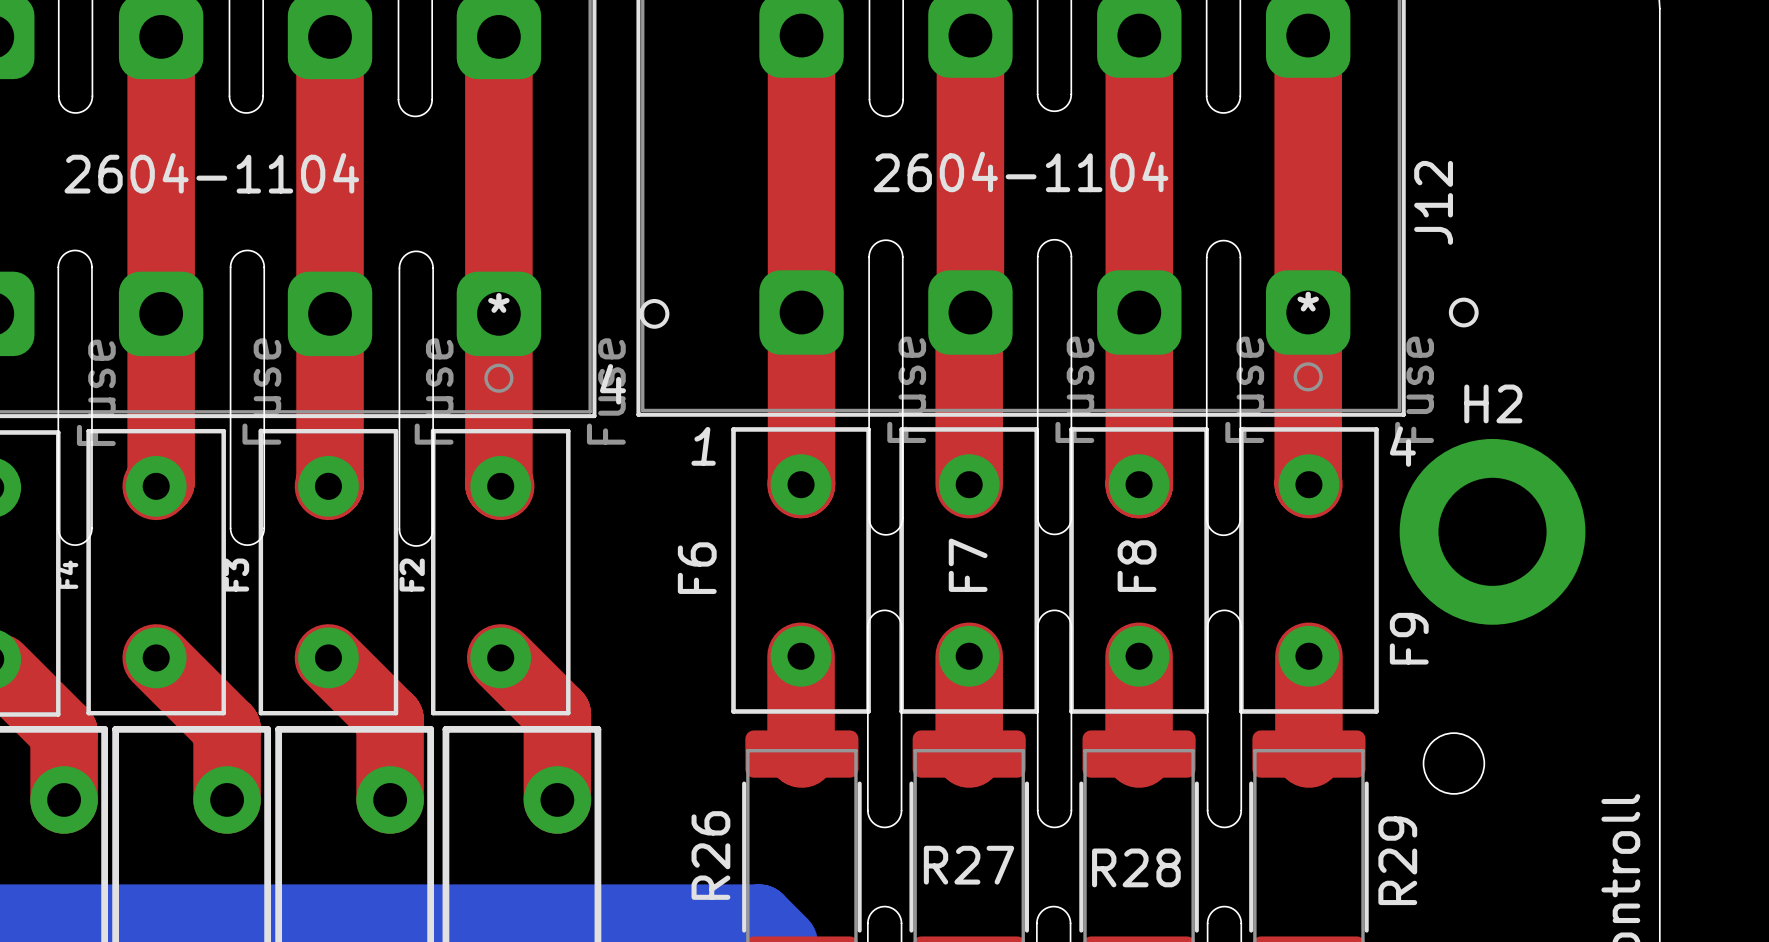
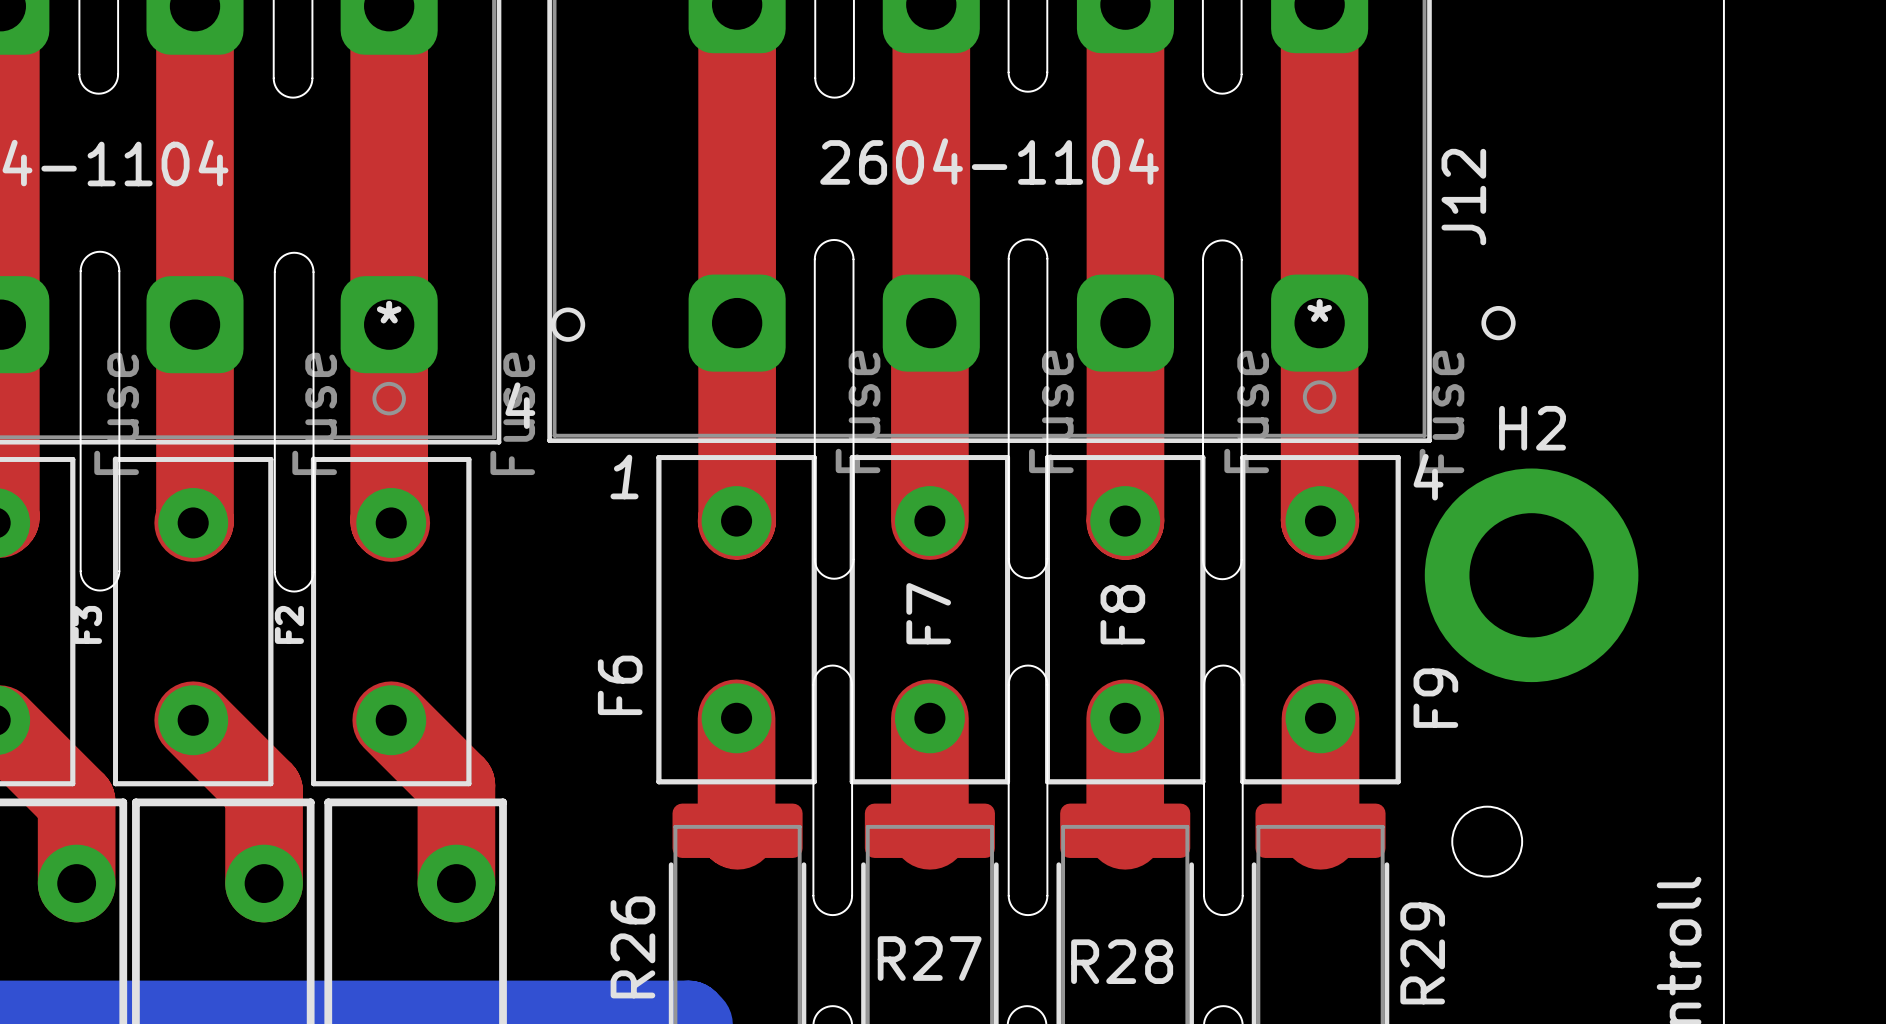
F6 name position: F6 (697, 568) -> F6 (620, 685)

